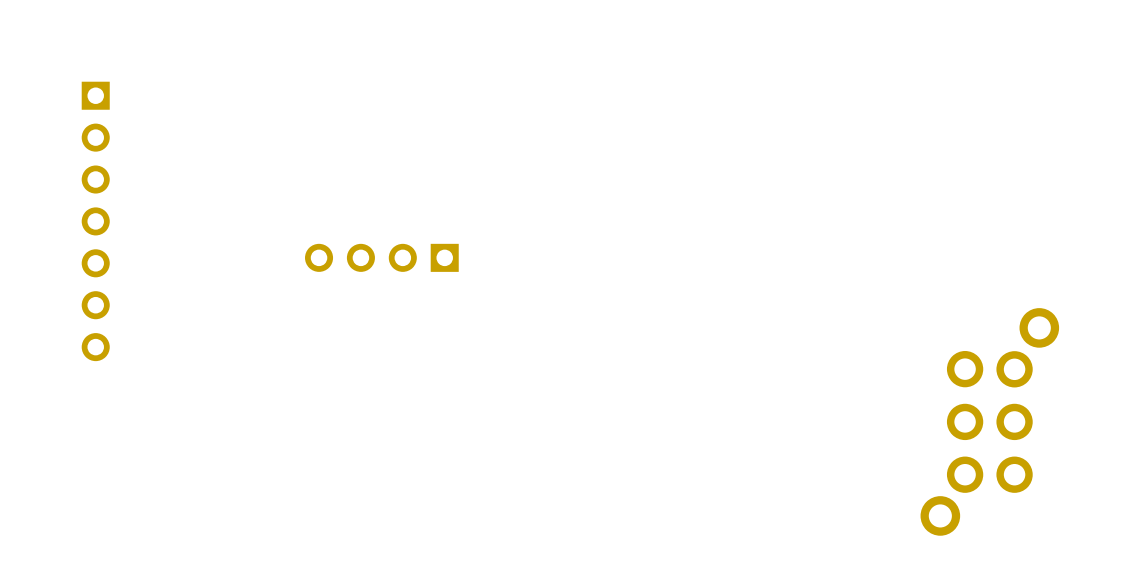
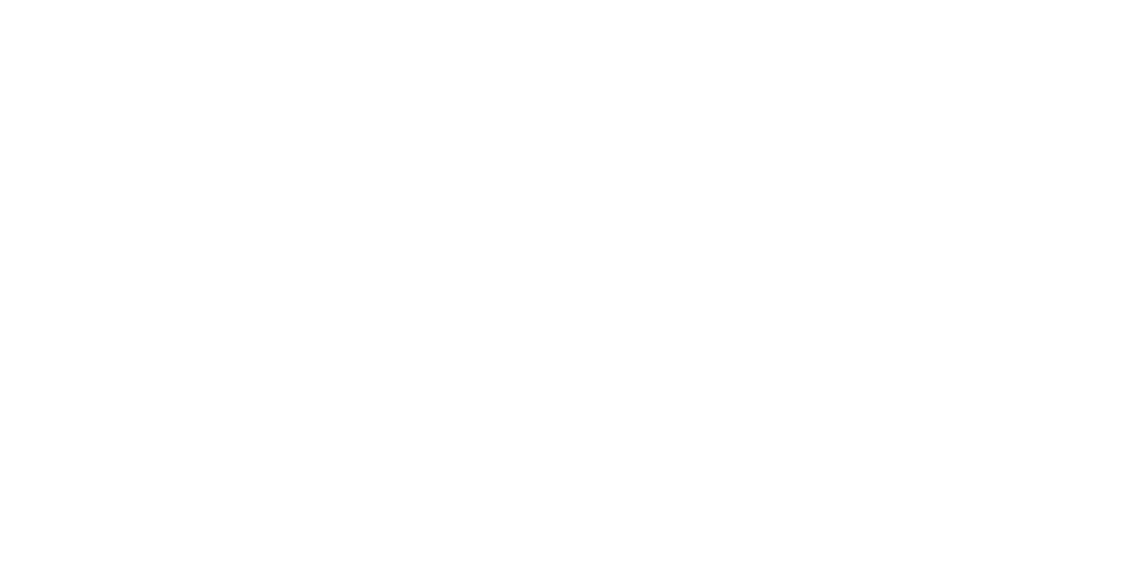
part: (95, 221) -> none
part: (381, 257) -> none
part: (989, 421) -> none

